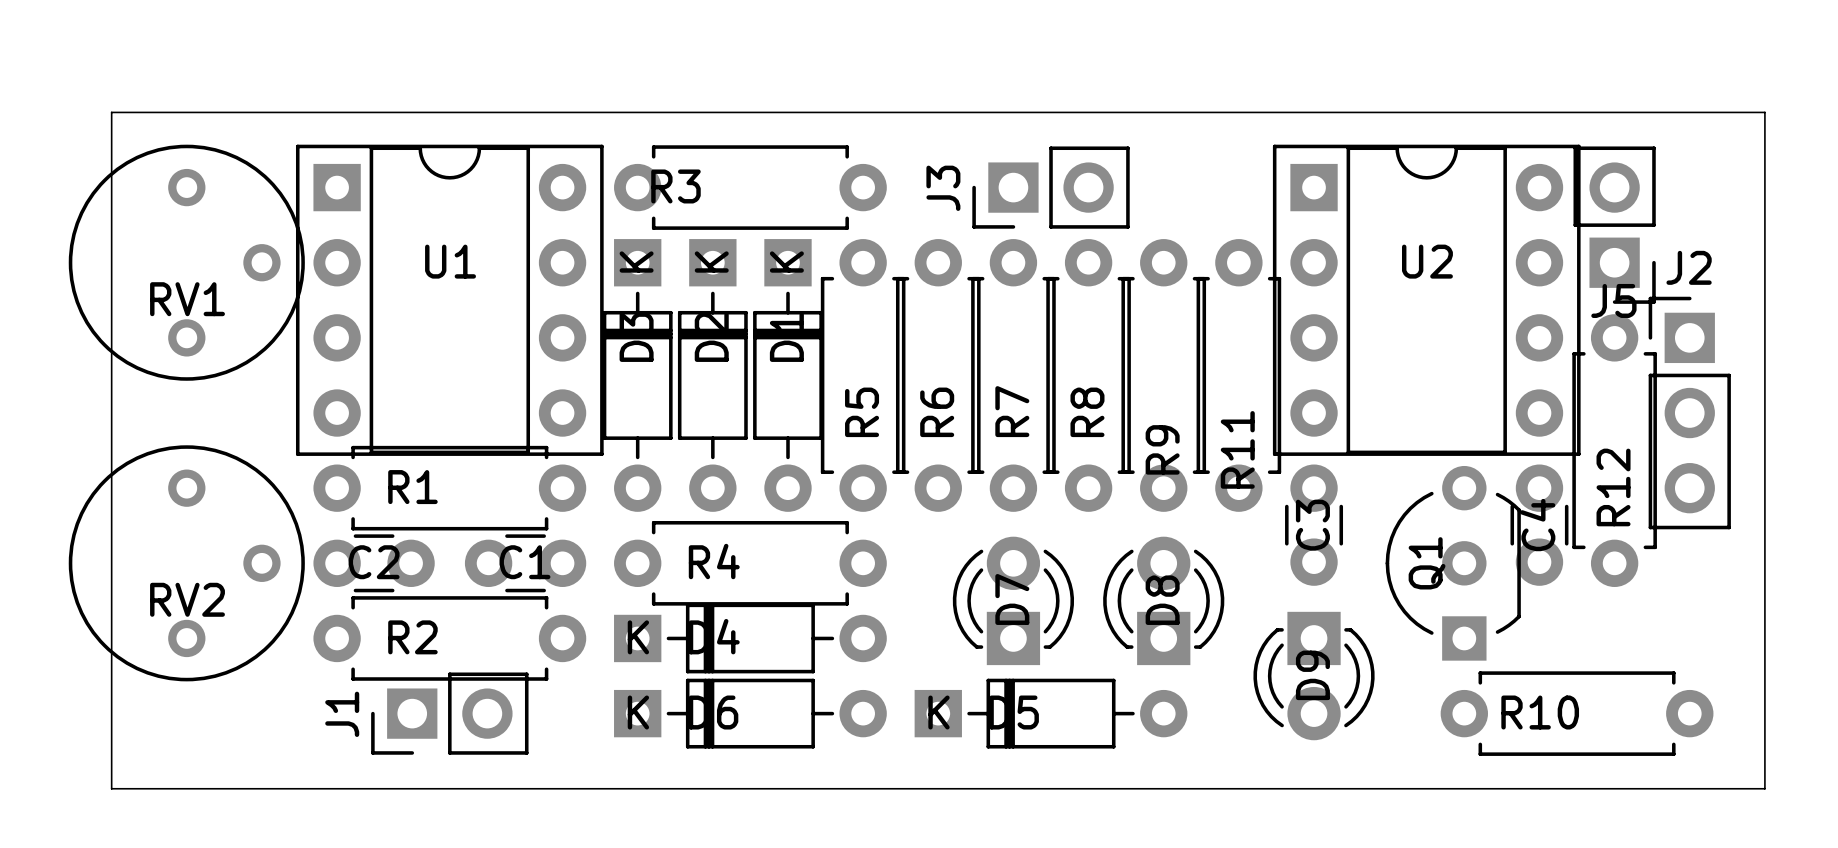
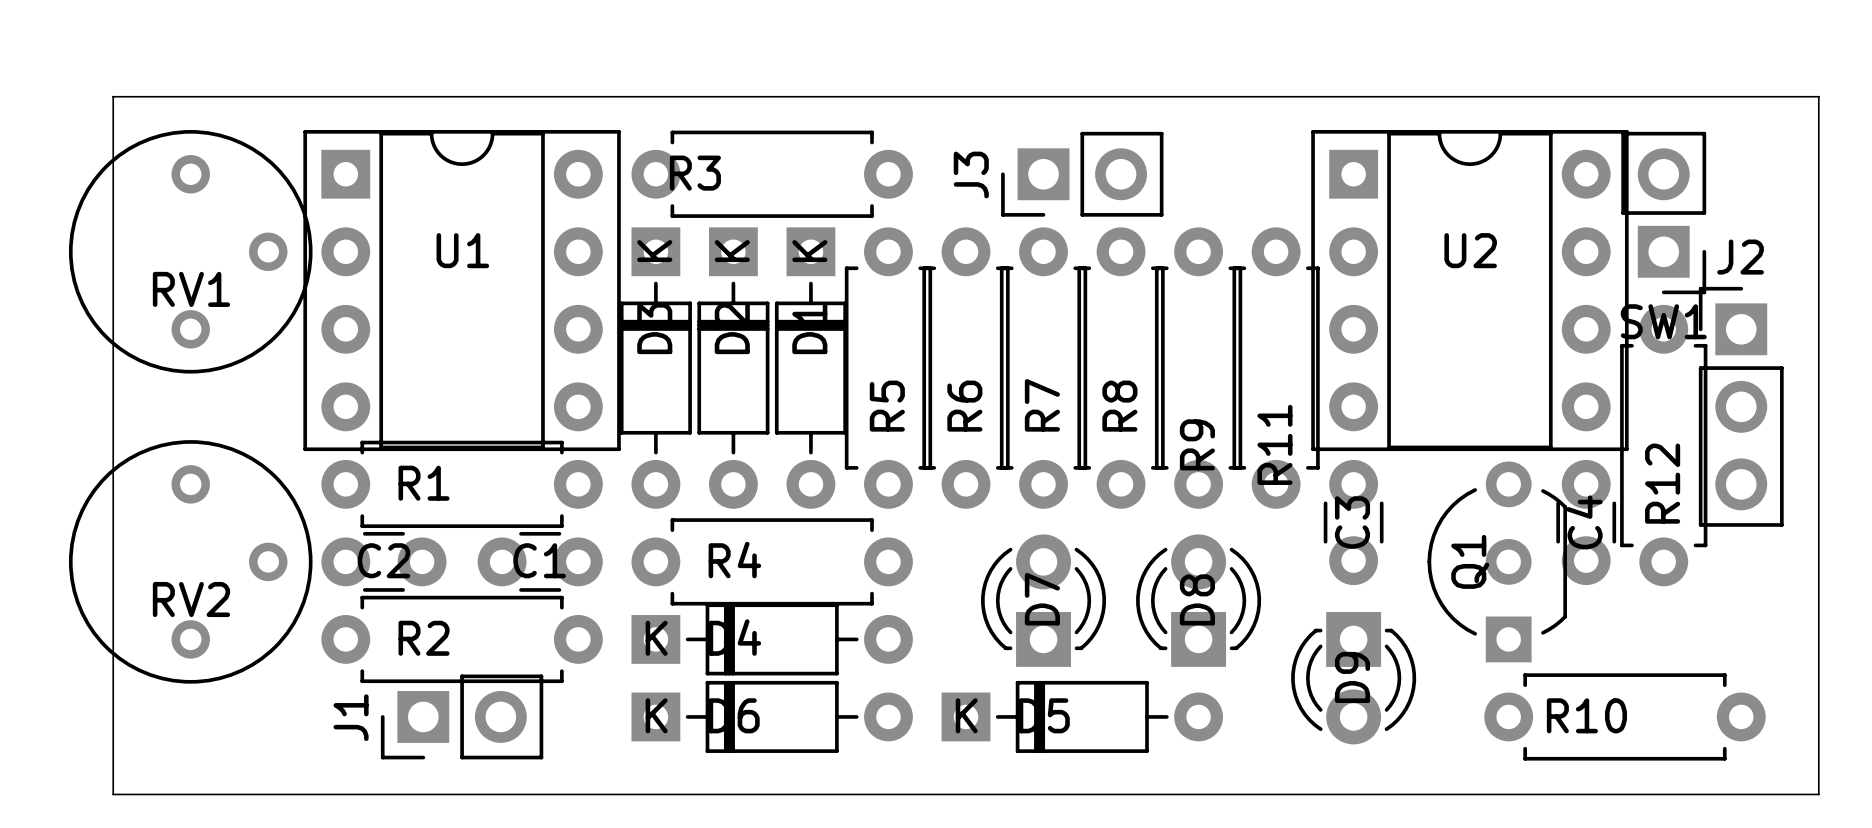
J5 name: J5 (1613, 300) -> SW1 (1663, 321)

